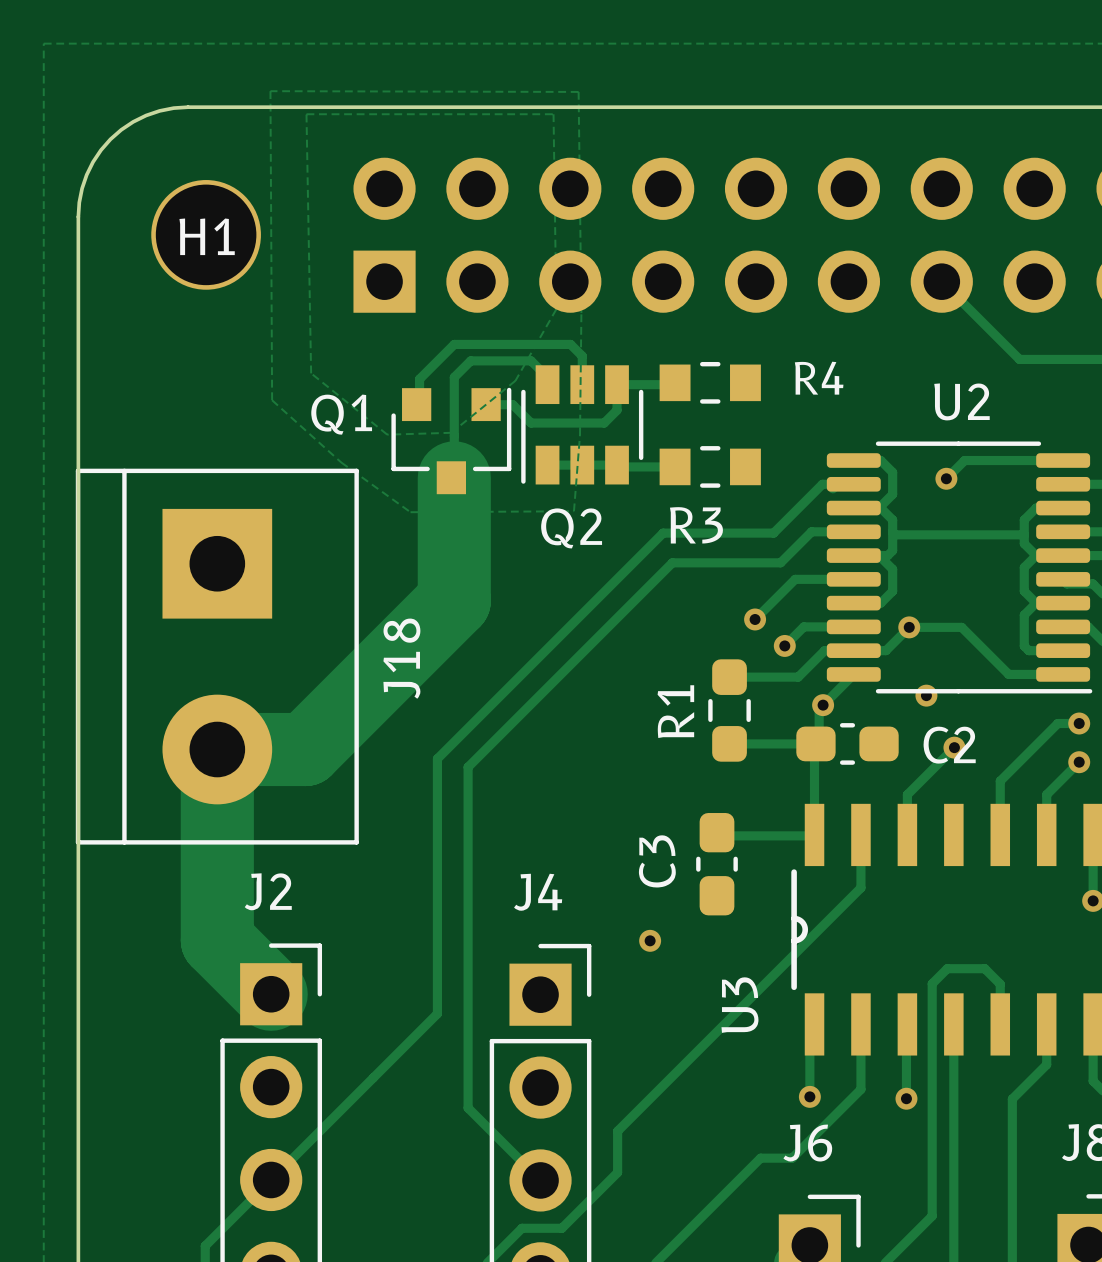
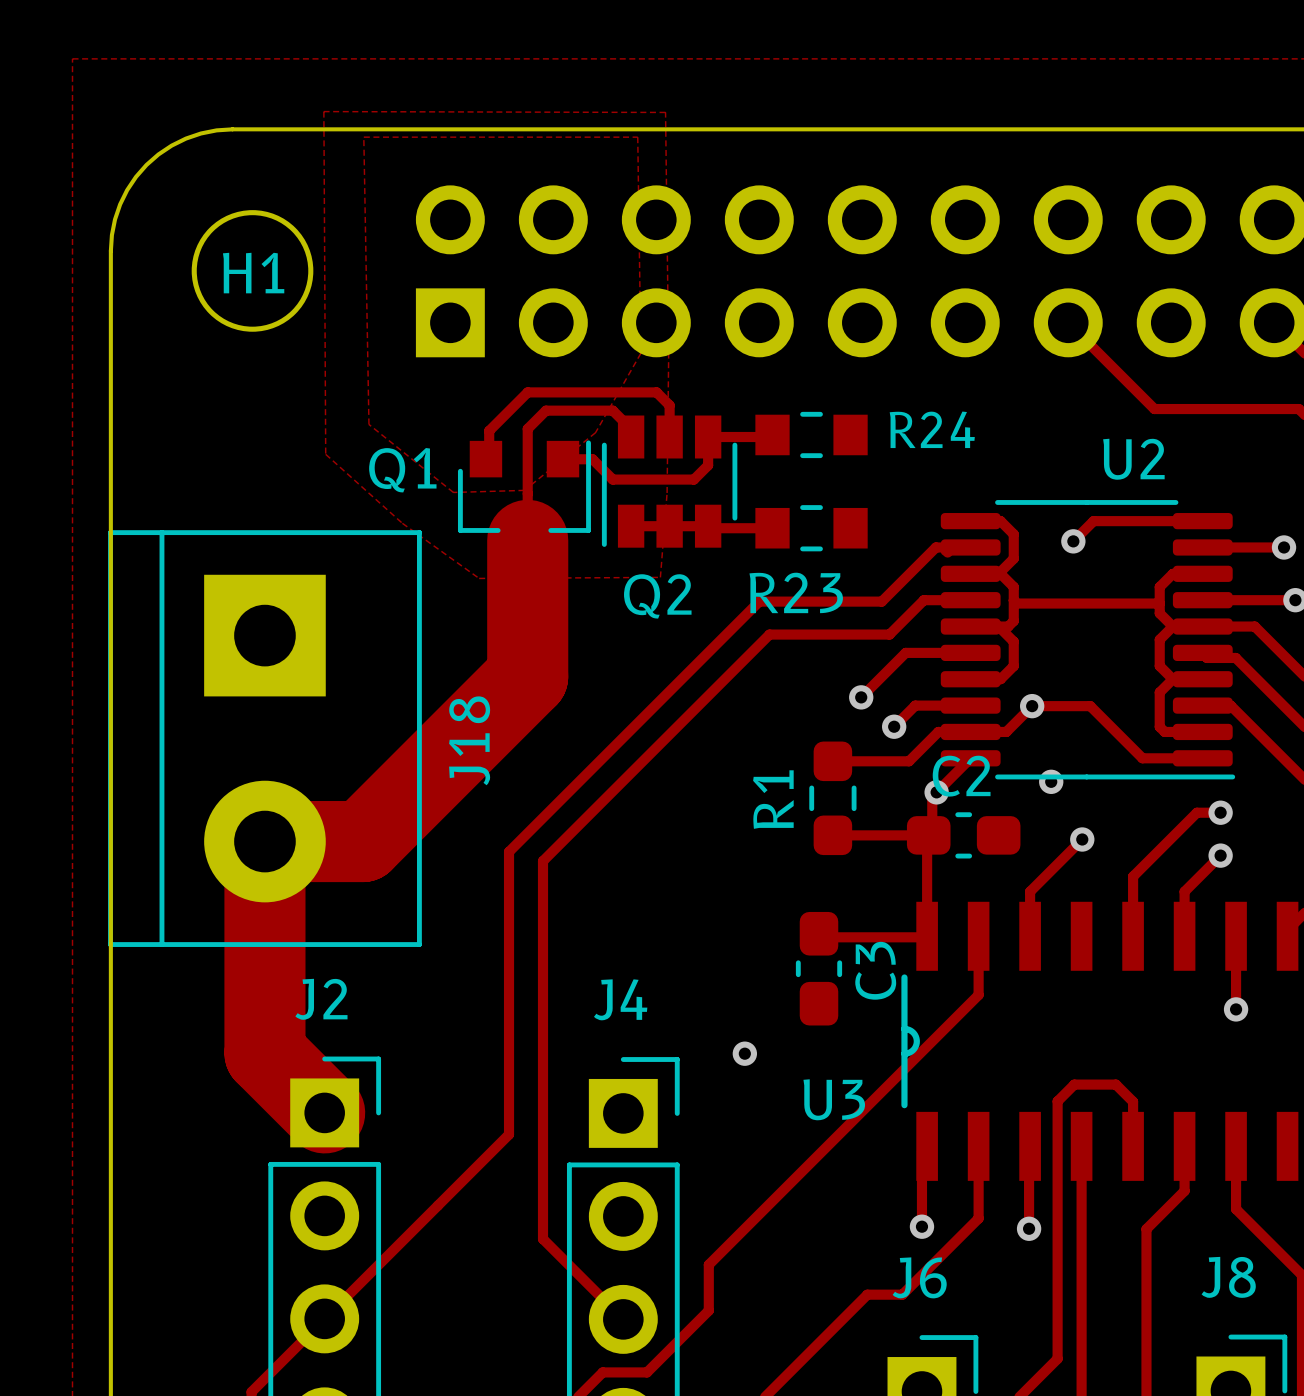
R4 name: R4 (819, 378) -> R24 (932, 429)
U2 name position: U2 (961, 401) -> U2 (1133, 459)
R3 name: R3 (696, 525) -> R23 (796, 592)
C2 name position: C2 (949, 745) -> C2 (961, 776)
C3 name position: C3 (657, 861) -> C3 (875, 970)
U3 name rotation: 0° (739, 1005) -> 90° clockwise (834, 1099)

